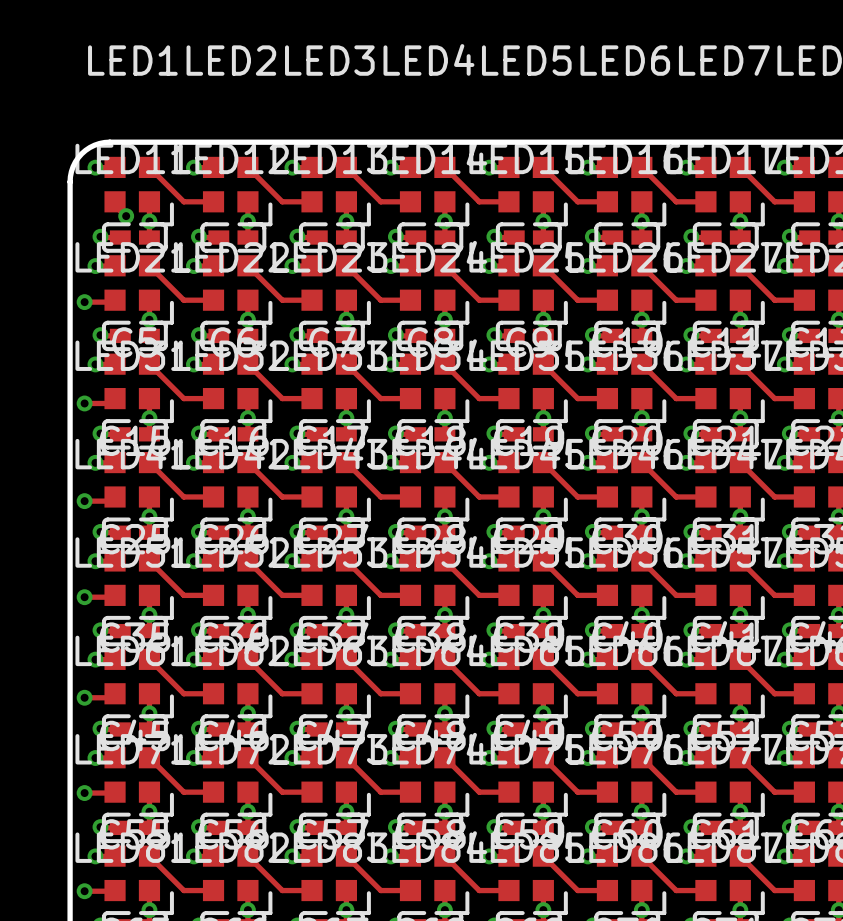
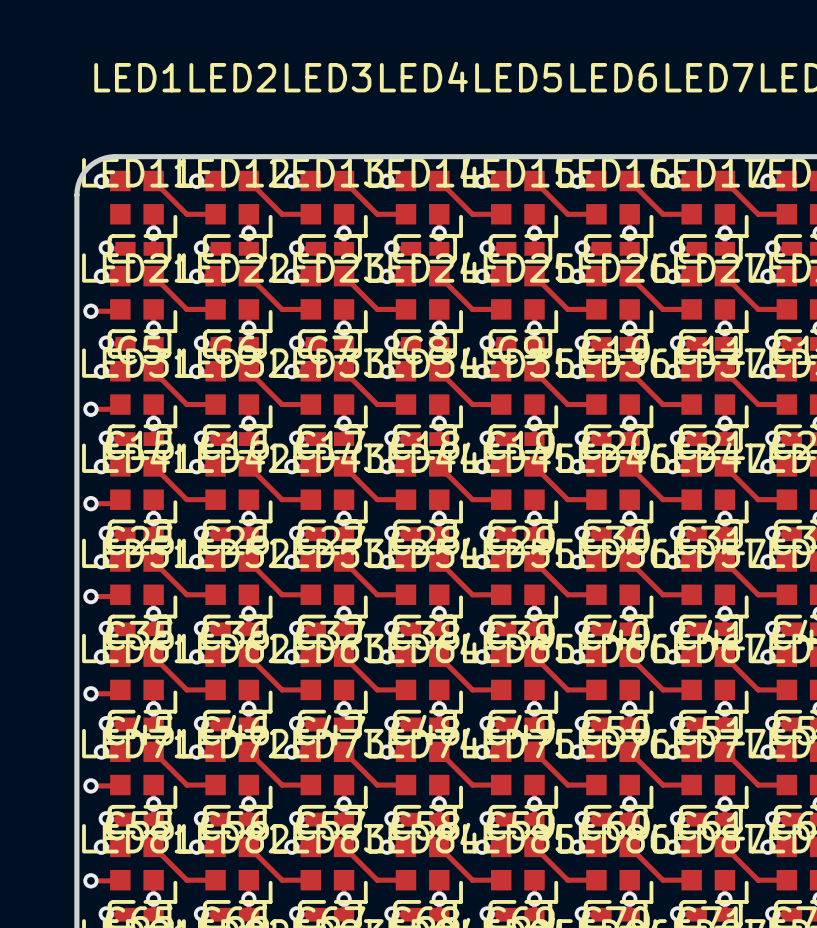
via: (126, 216) -> none

